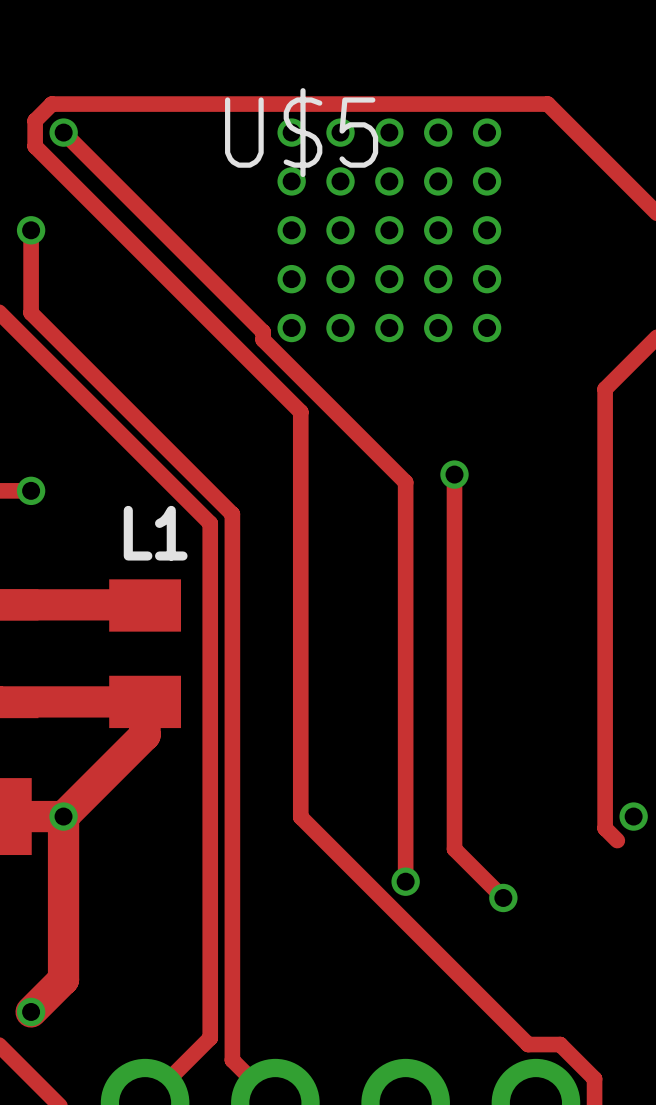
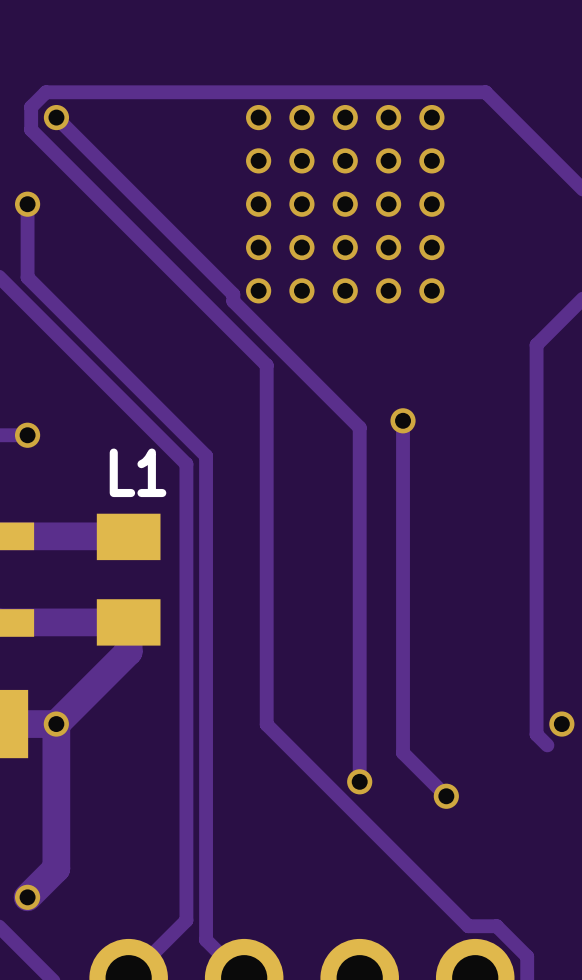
U$5 name: U$5 (301, 132) -> none

